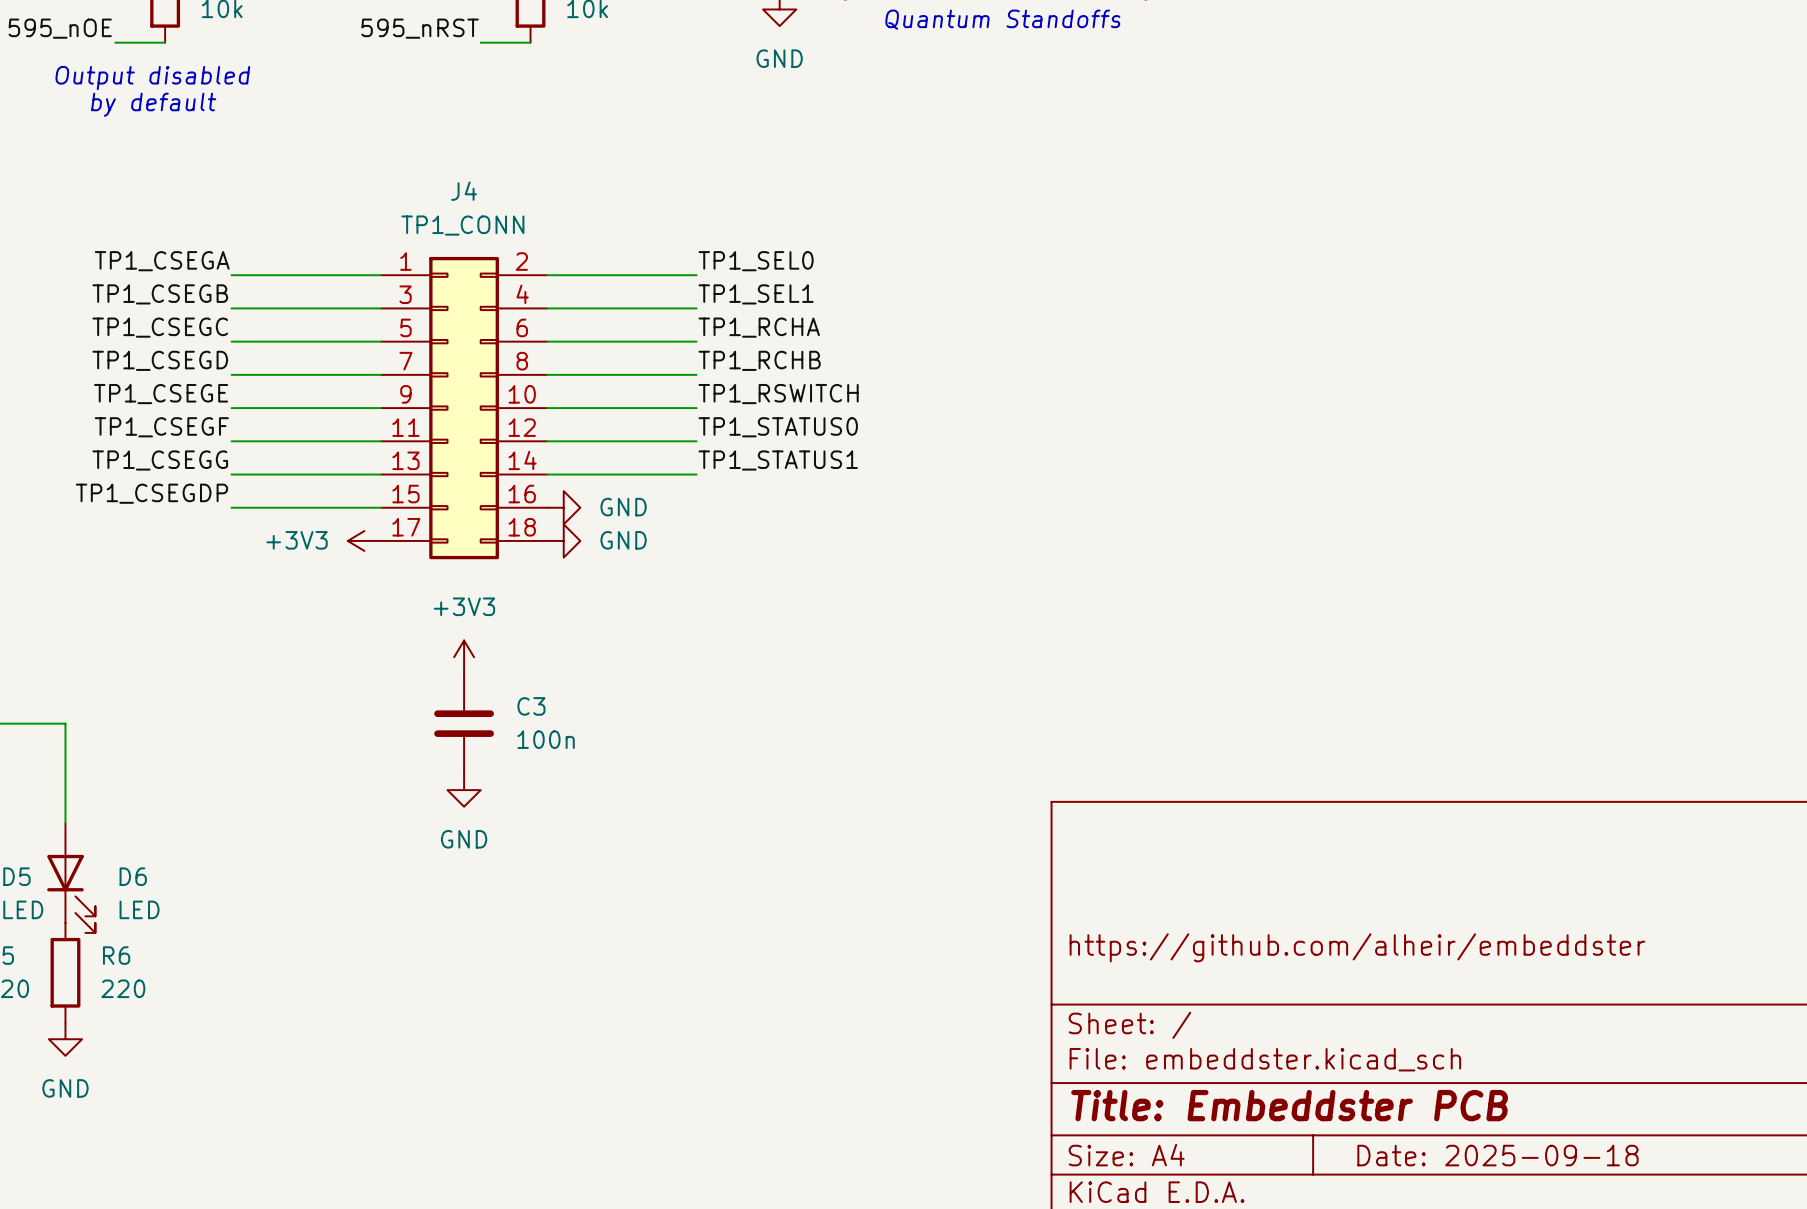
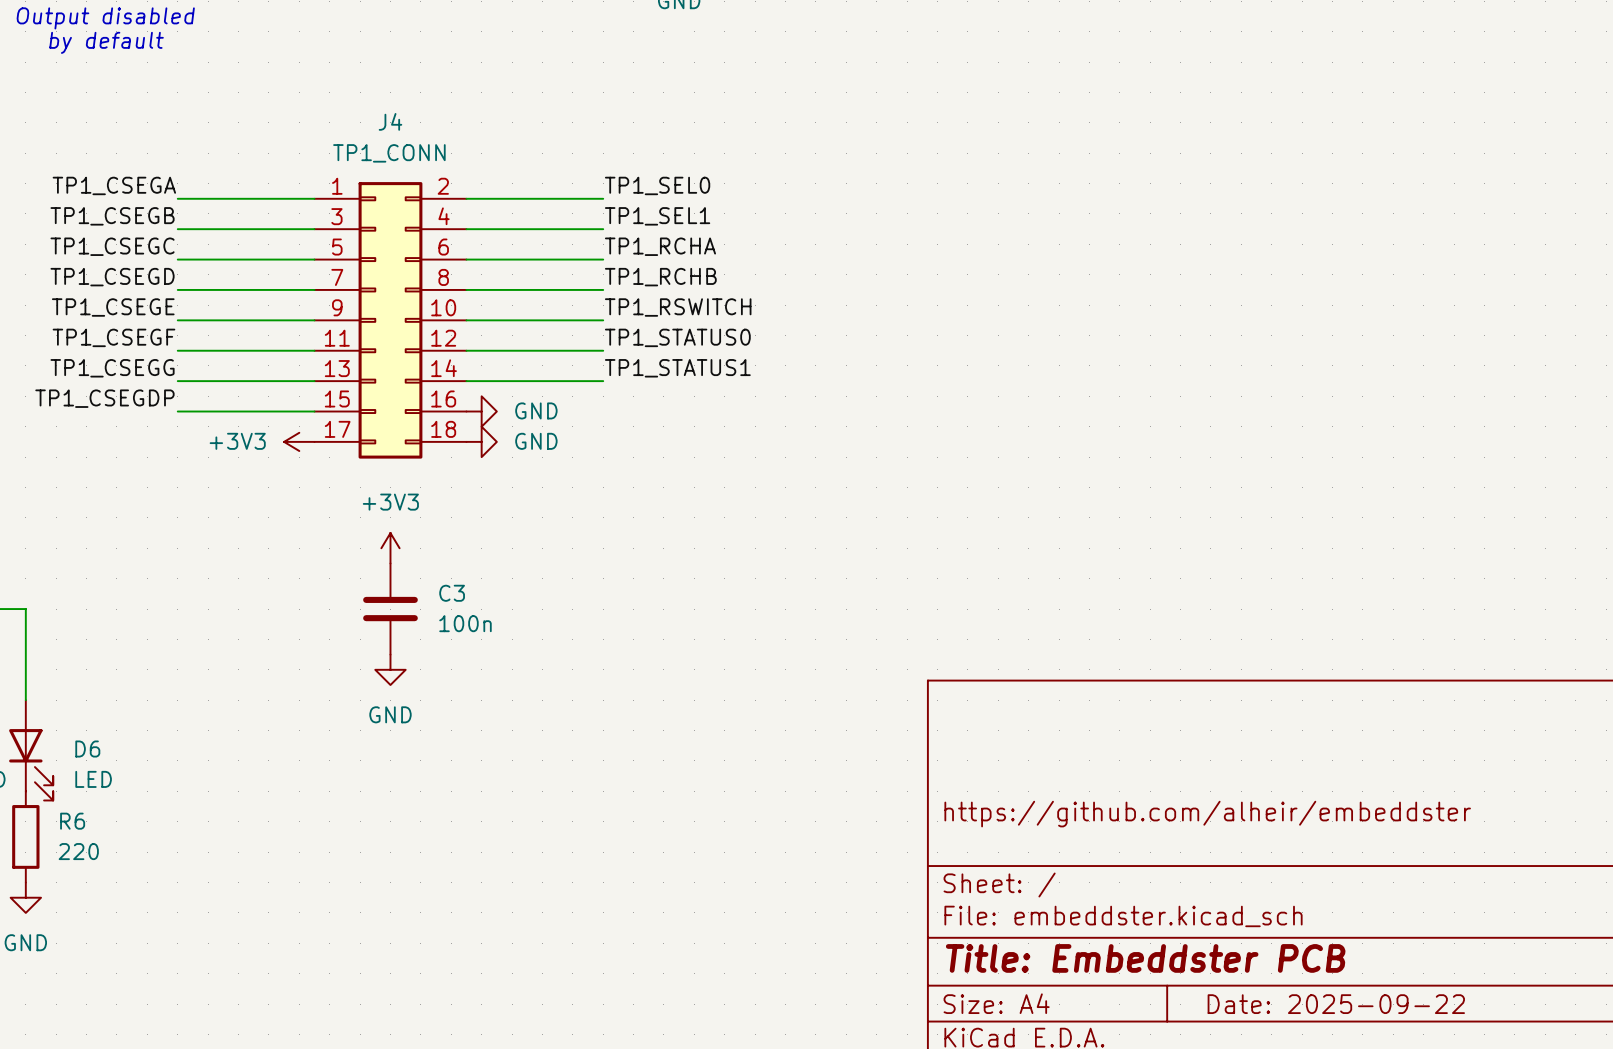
title block: Date: 2025-09-18 (1497, 1155) -> Date: 2025-09-22 (1336, 1004)

